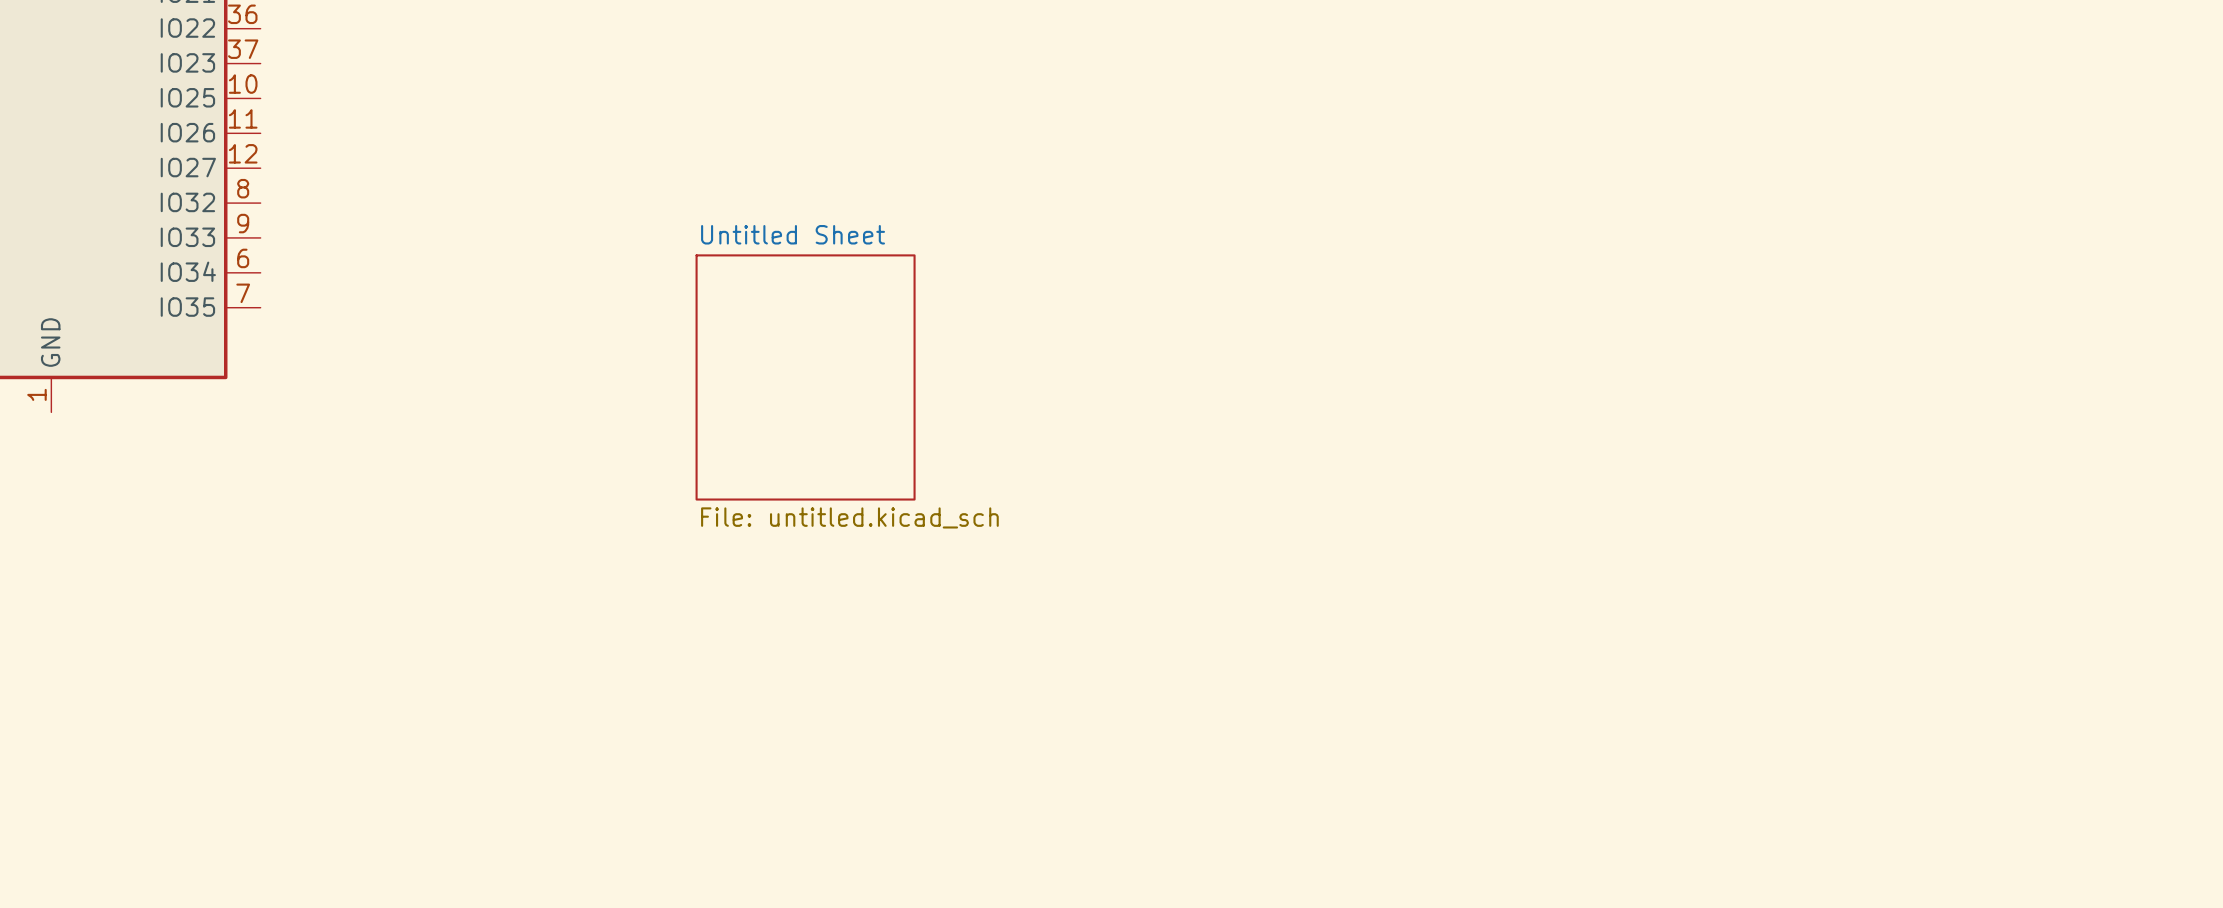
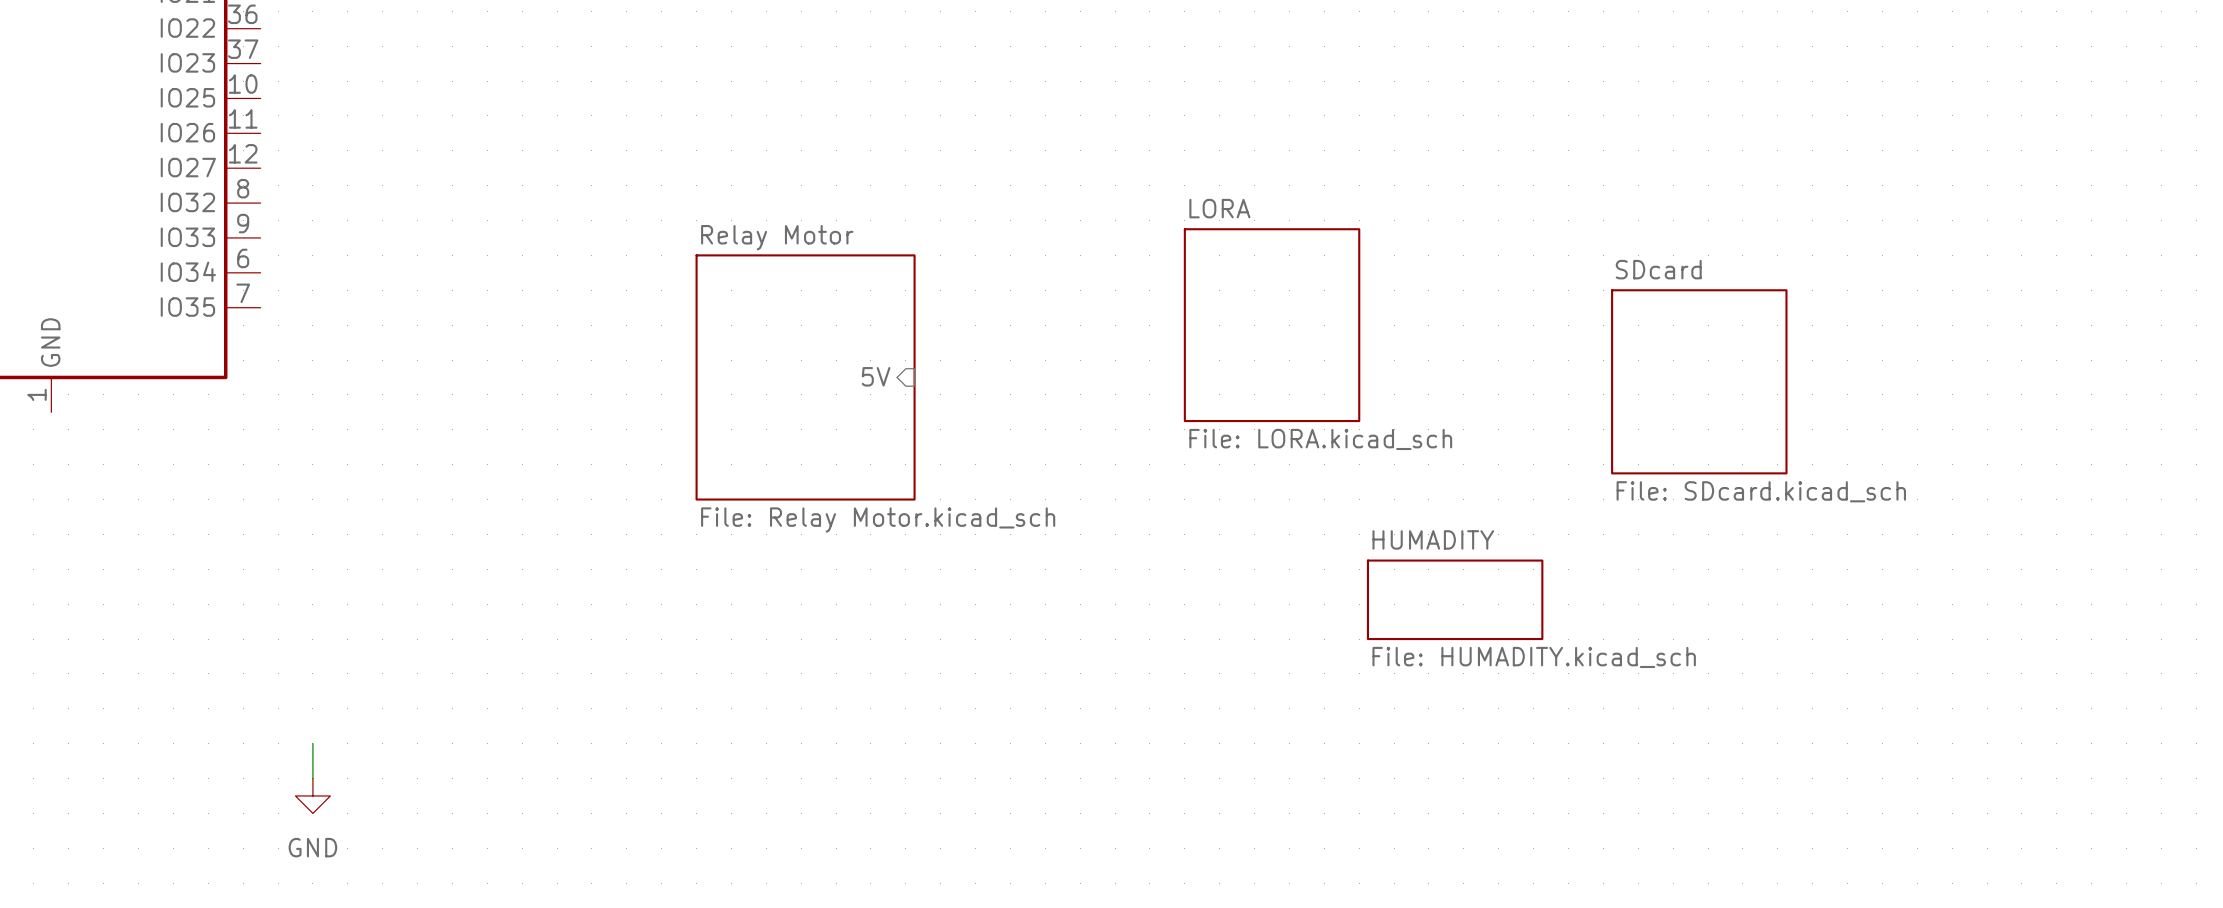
sheet Untitled Sheet name: Untitled Sheet (793, 234) -> Relay Motor (777, 237)
sheet LORA: none -> File: LORA.kicad_sch (1272, 325)
sheet pin: none -> 5V (876, 376)
sheet SDcard: none -> File: SDcard.kicad_sch (1699, 381)
sheet Untitled Sheet value: File: untitled.kicad_sch (849, 517) -> File: Relay Motor.kicad_sch (878, 520)
sheet HUMADITY: none -> File: HUMADITY.kicad_sch (1455, 599)
wire: none -> (312, 743) (312, 778)
power symbol: none -> GND (312, 795)

